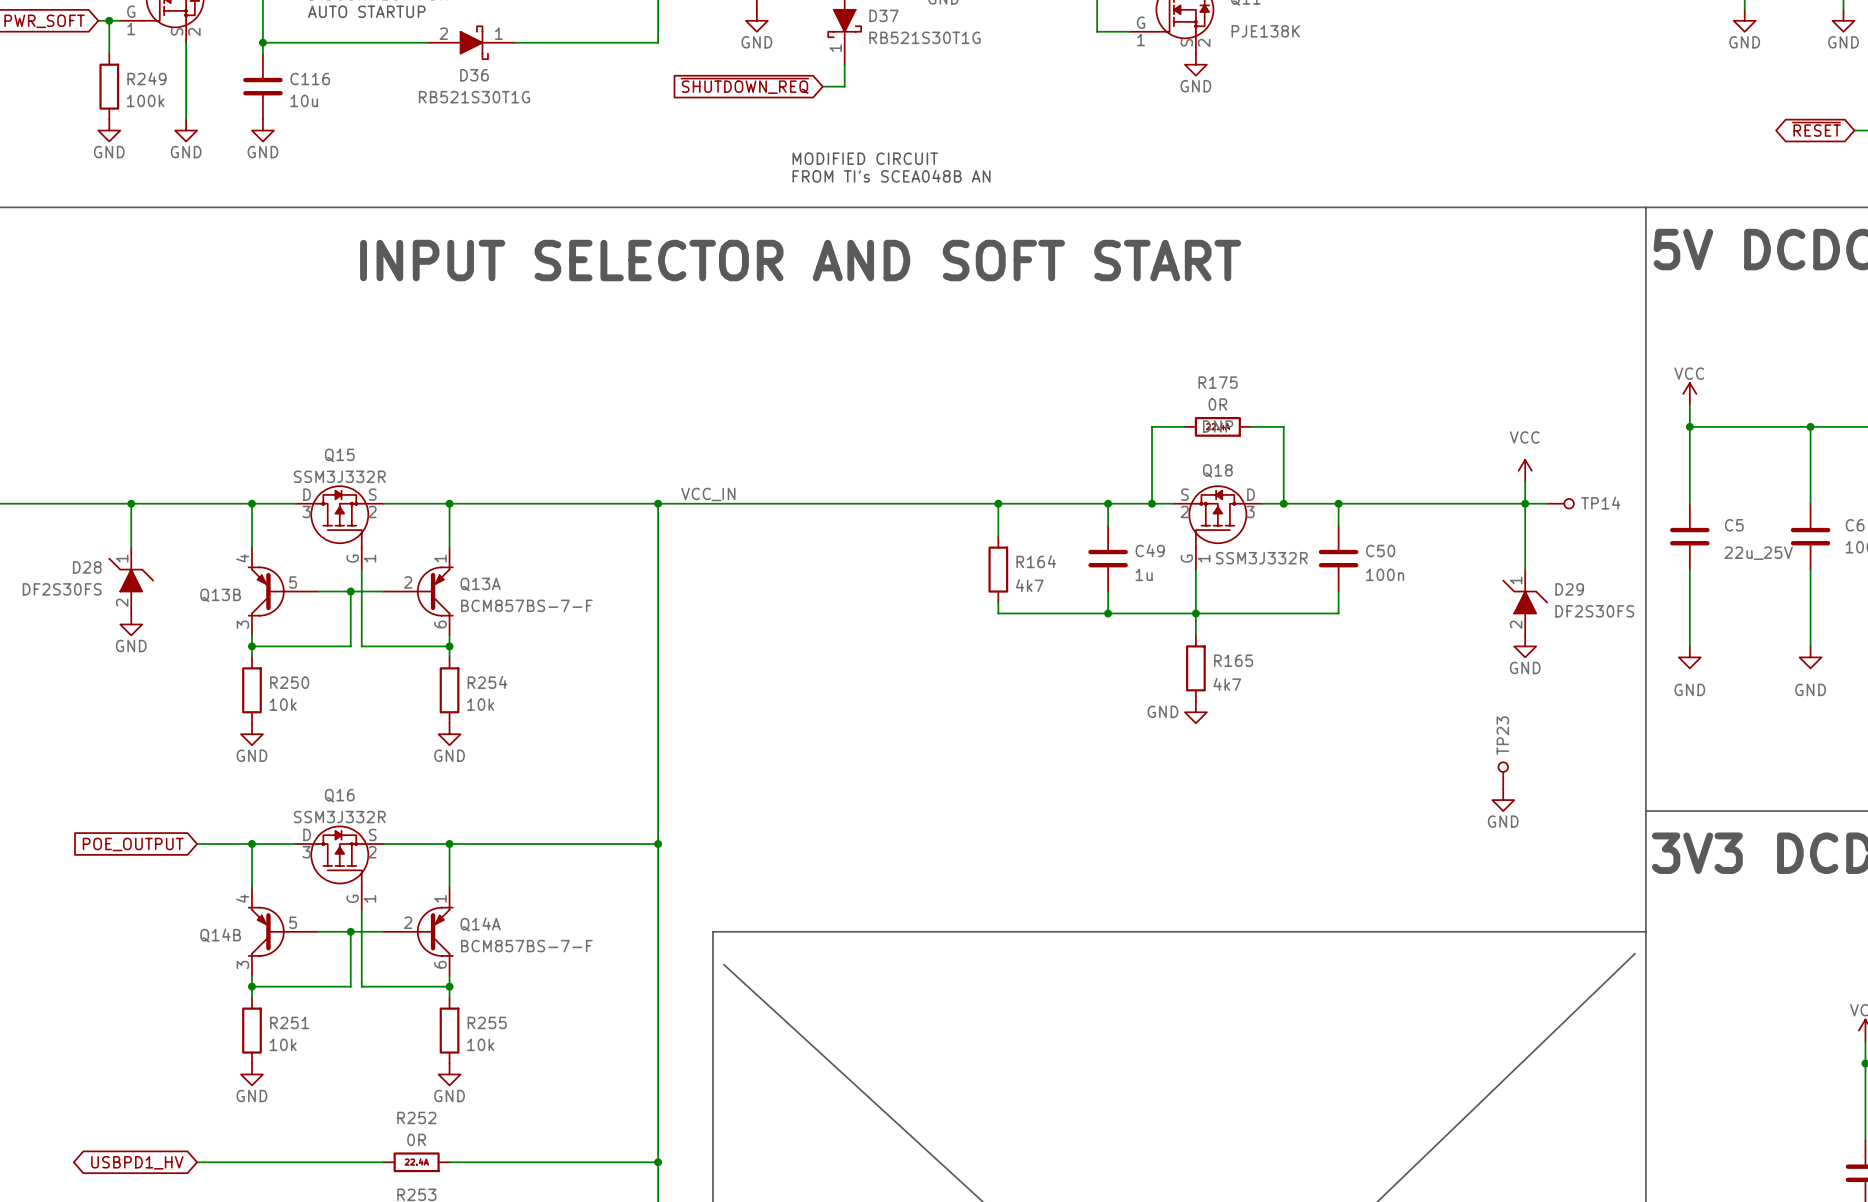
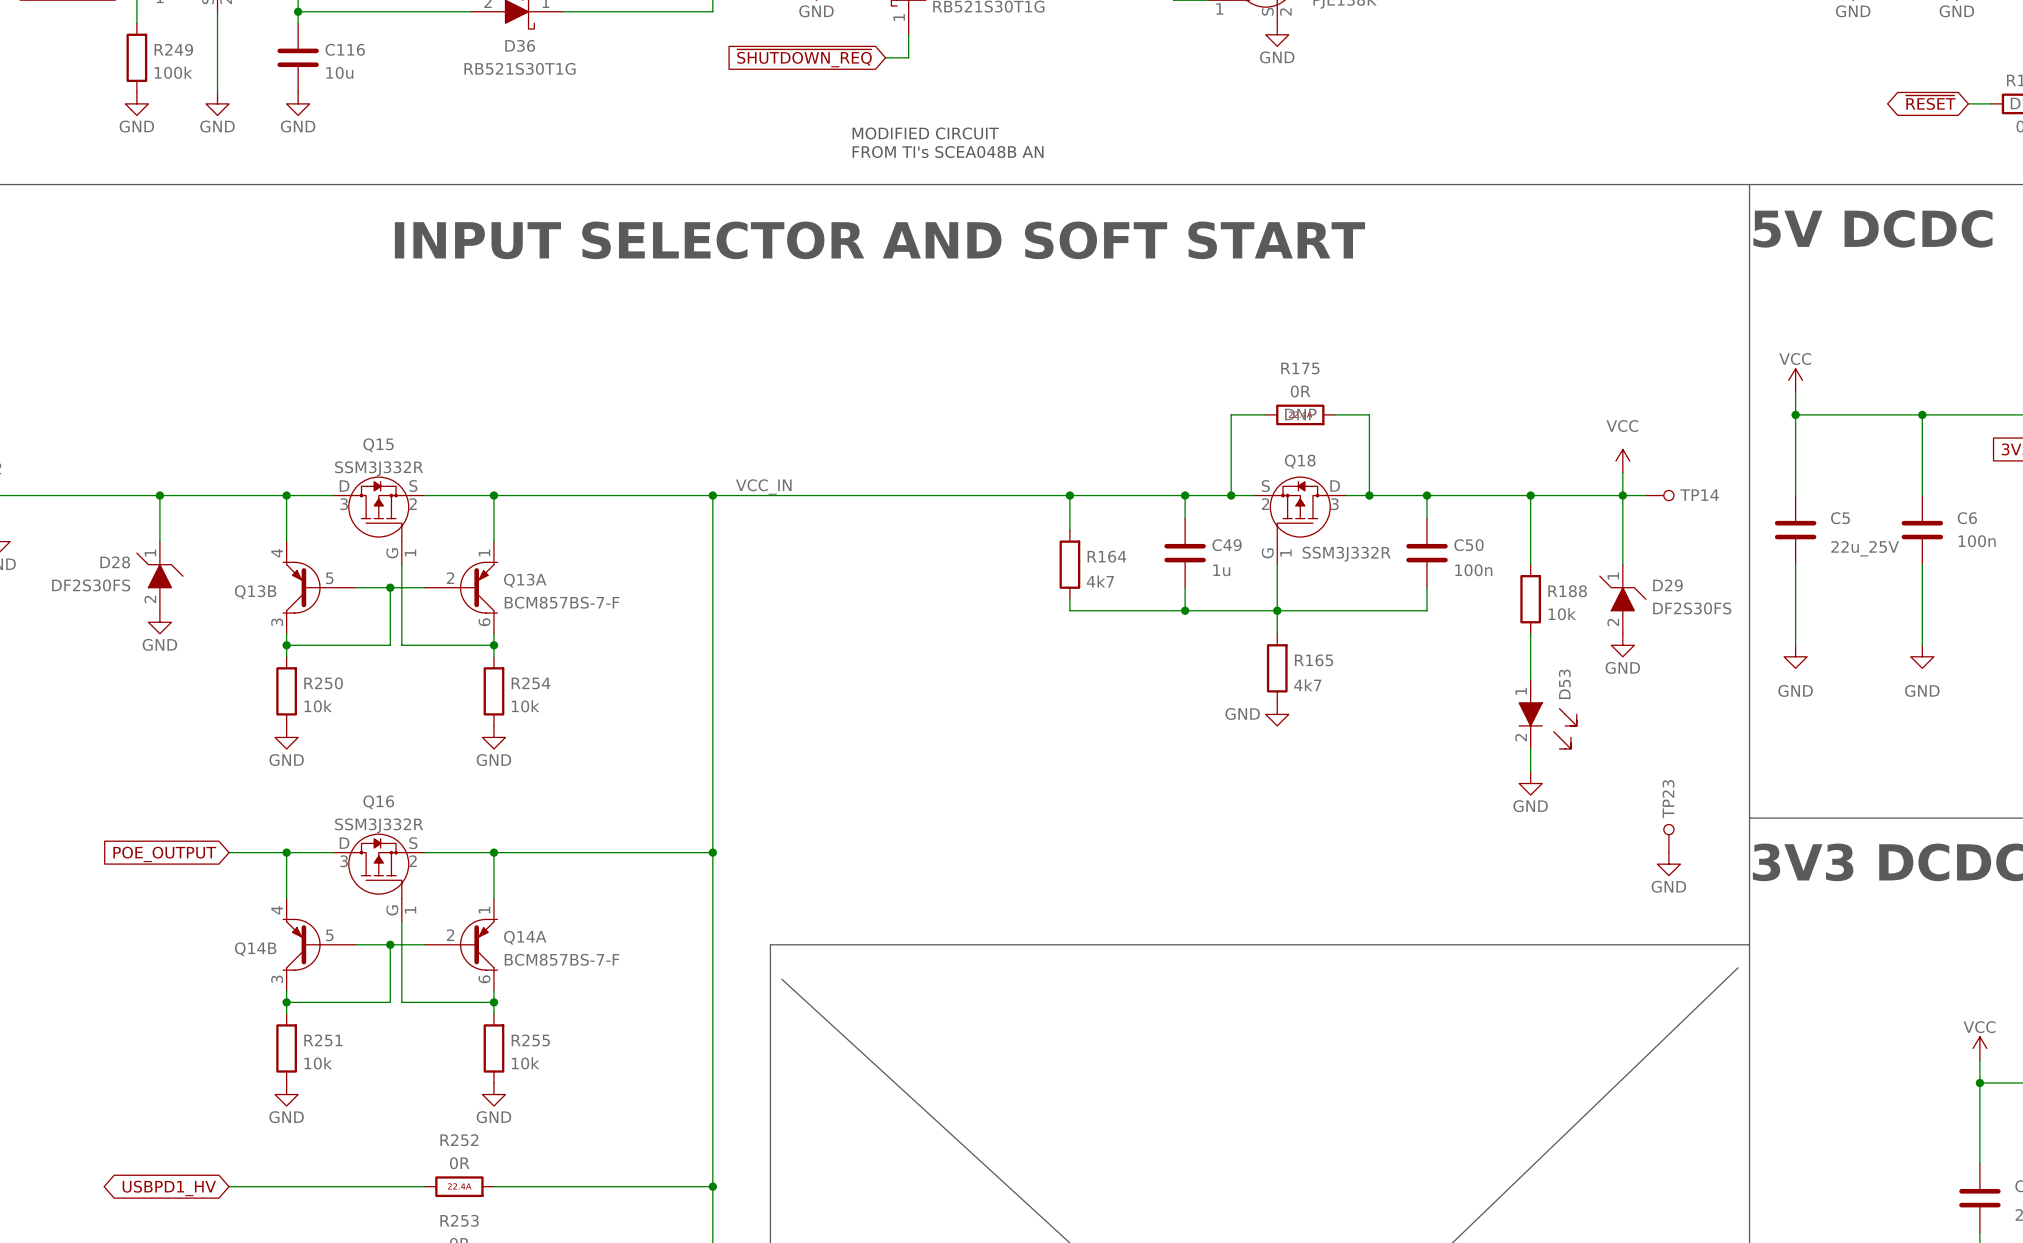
wire: none -> (1530, 495) (1530, 564)
junction: none -> (1530, 495)
R188: none -> (1530, 599)
wire: none -> (1530, 633) (1530, 679)
D53: none -> (1547, 714)
wire: none -> (1530, 748) (1530, 772)
TP23 position: (1503, 775) -> (1668, 838)
power symbol: none -> GND (1530, 783)
power symbol: GND (1503, 800) -> none
power symbol: none -> GND (1668, 864)

